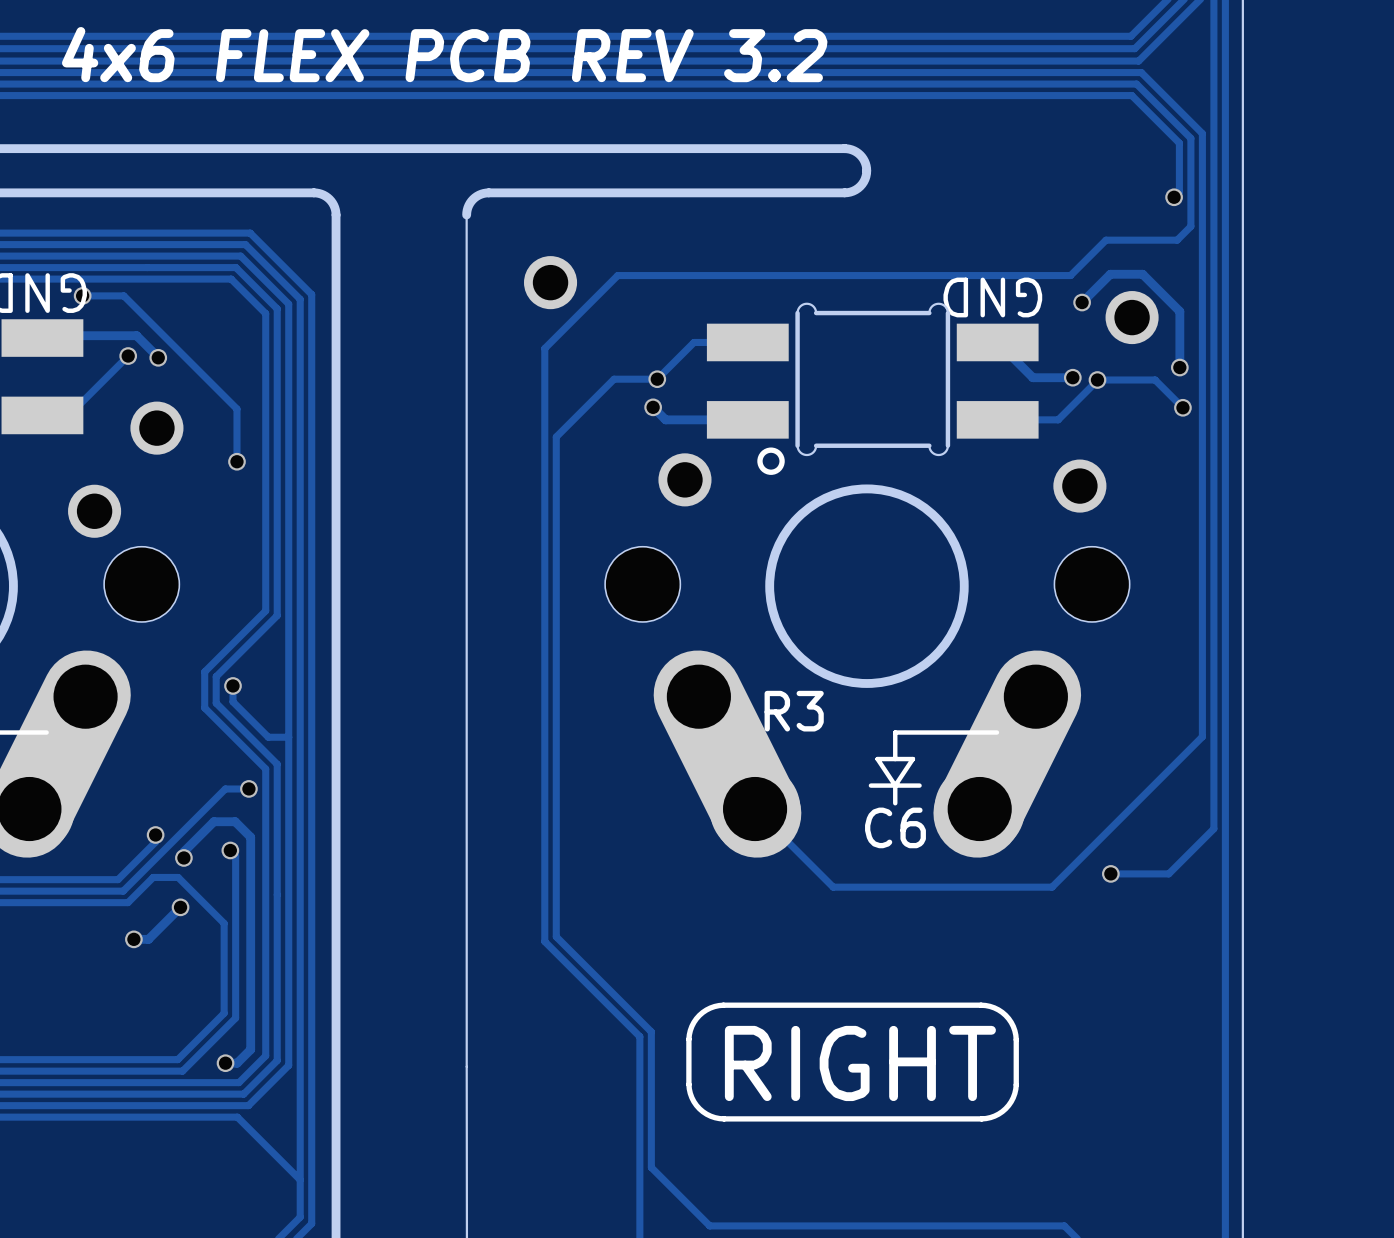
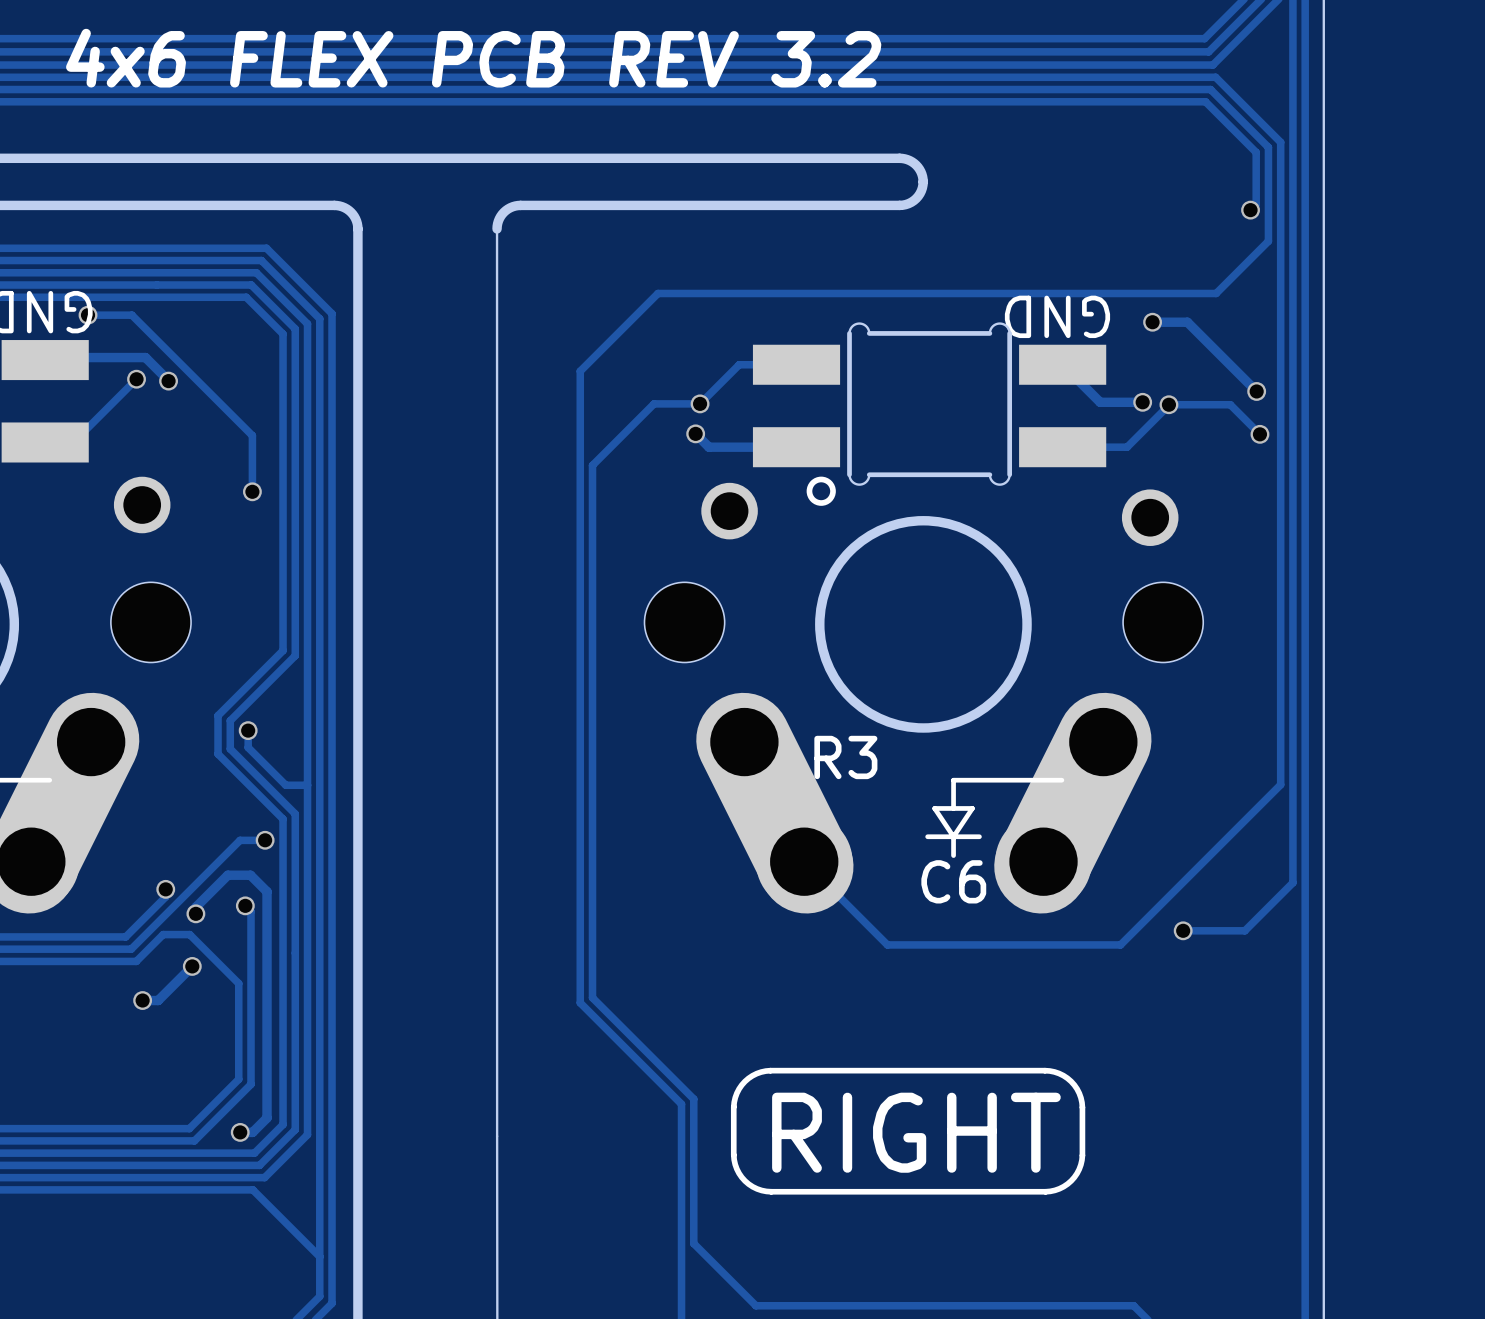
track: (1177, 240) (1105, 240) (1070, 275) -> (1253, 255) (1216, 293) (1140, 293)
part: (550, 282) -> none
track: (1082, 302) (1110, 274) (1142, 274) (1179, 311) (1179, 367) -> (1152, 322) (1187, 322) (1256, 391)
part: (1132, 317) -> none
part: (156, 428) -> none
part: none -> (142, 504)
part: (94, 511) -> none

